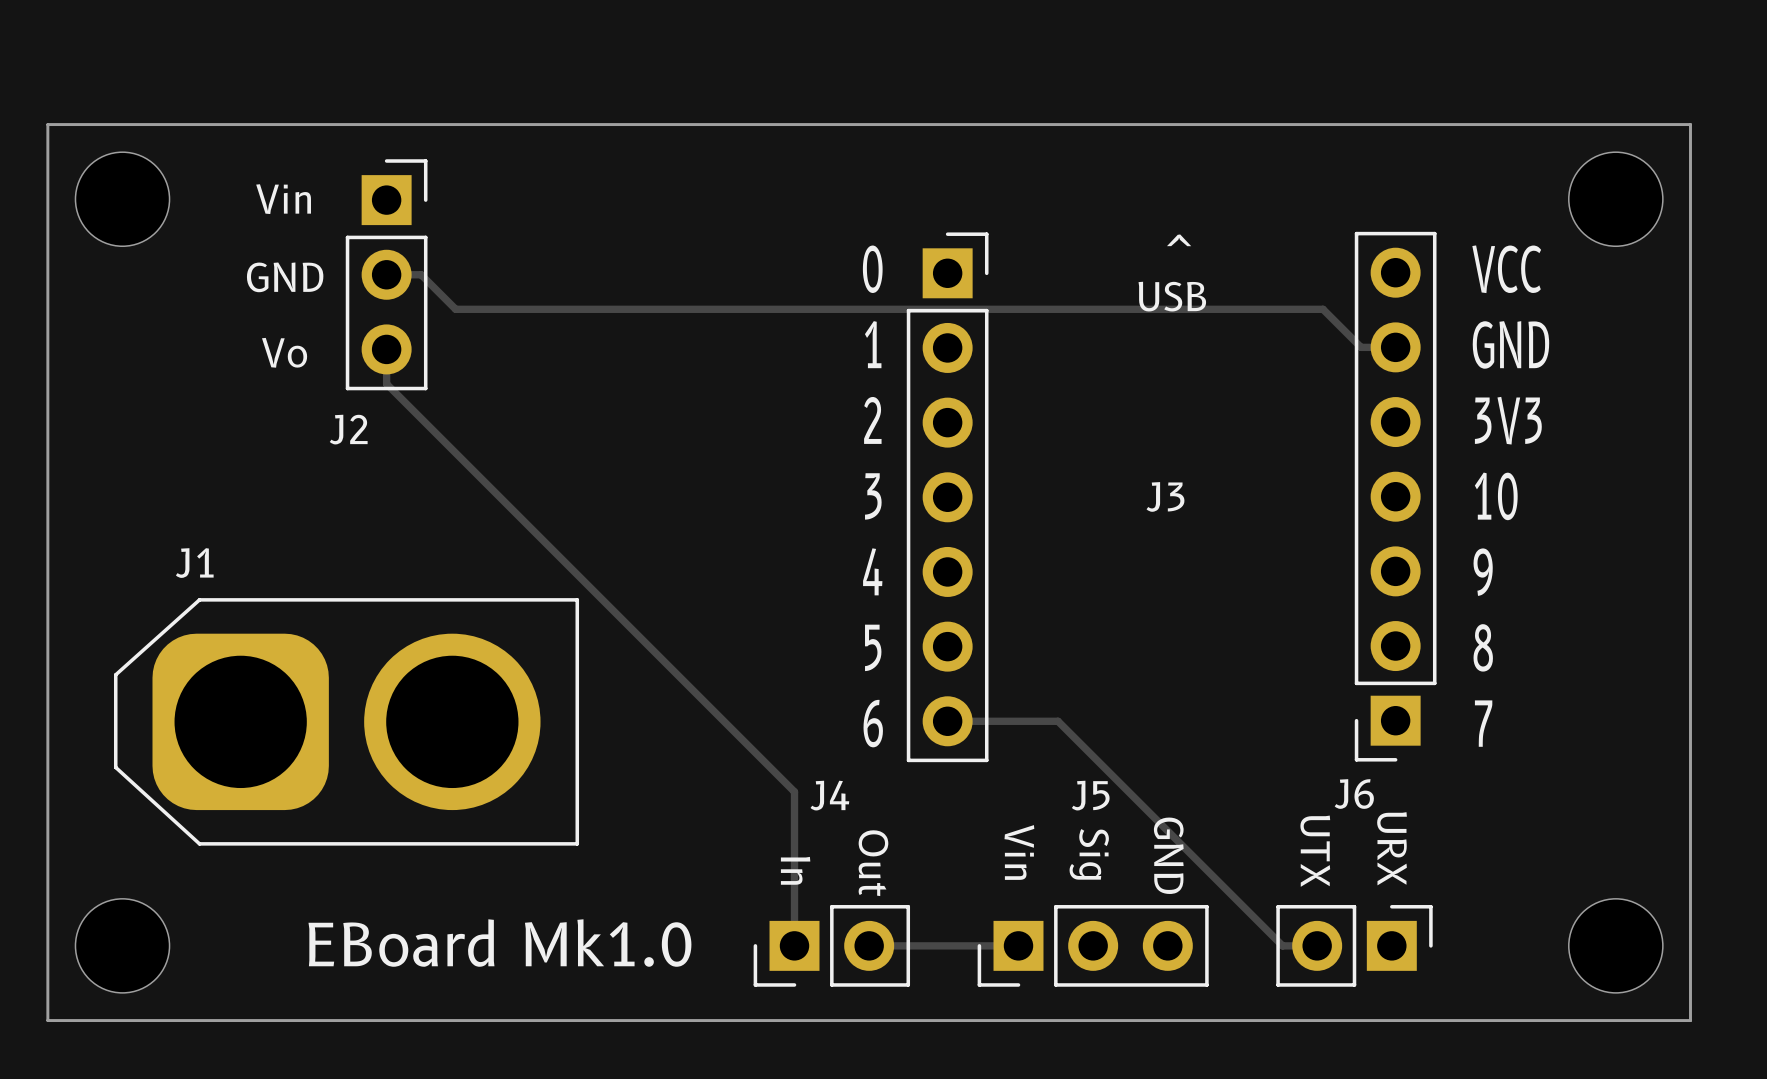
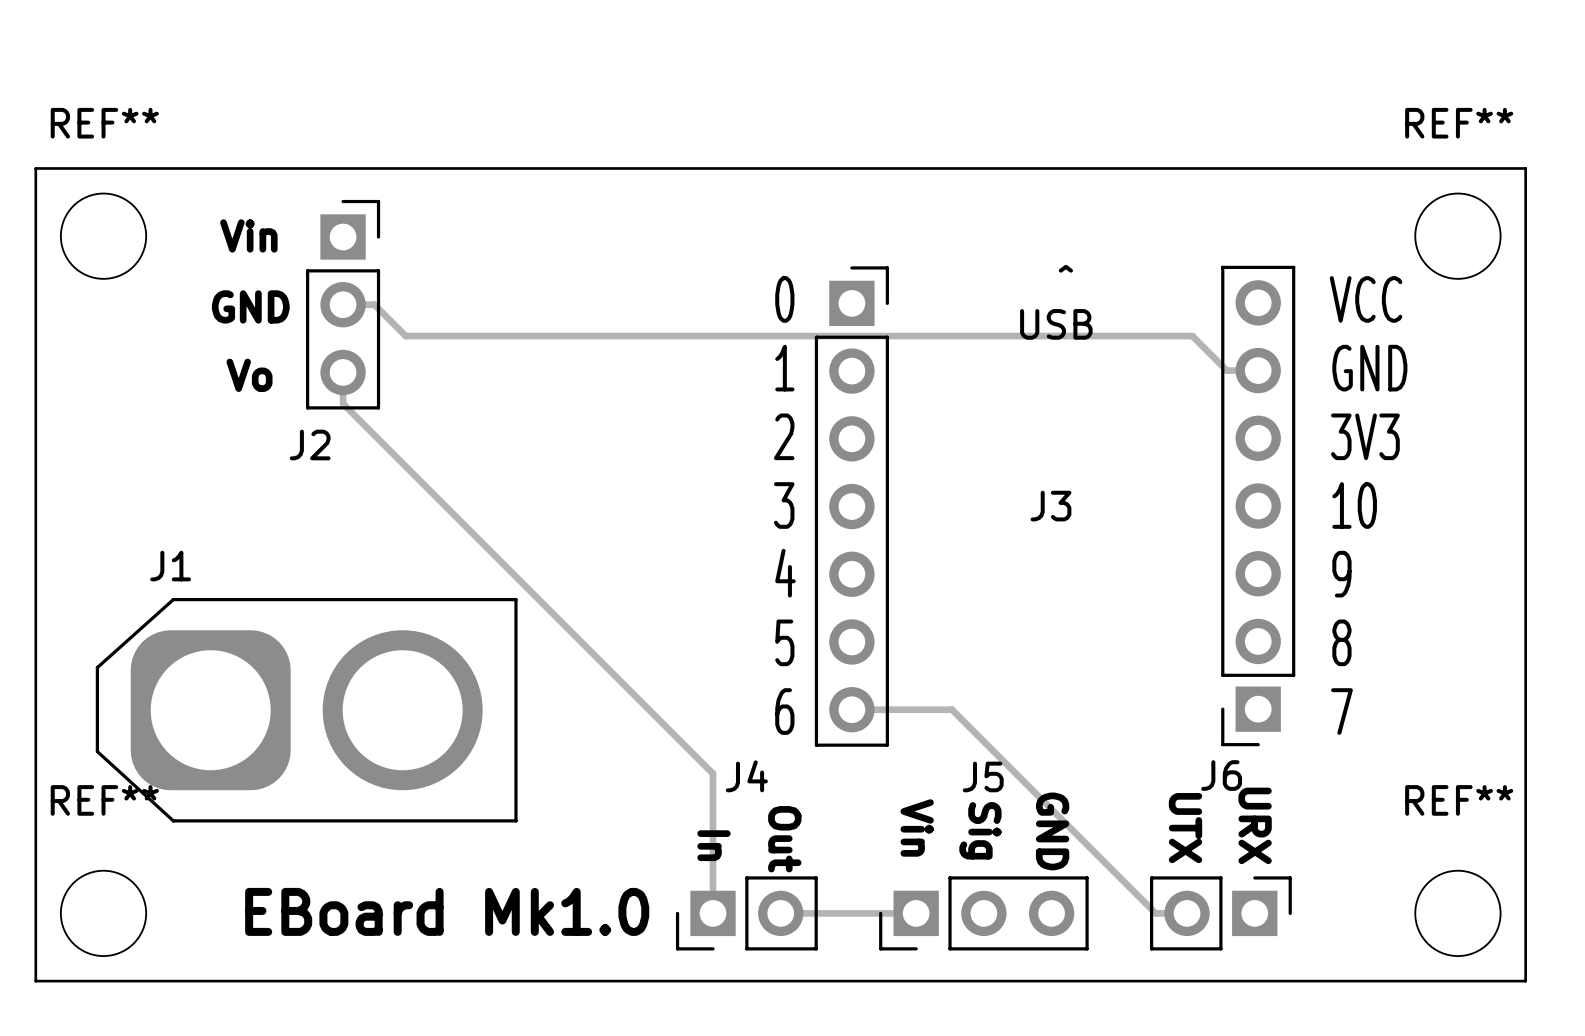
REF** name: none -> REF** (104, 123)
REF** name: none -> REF** (1459, 123)
REF** name: none -> REF** (104, 800)
REF** name: none -> REF** (1459, 800)

